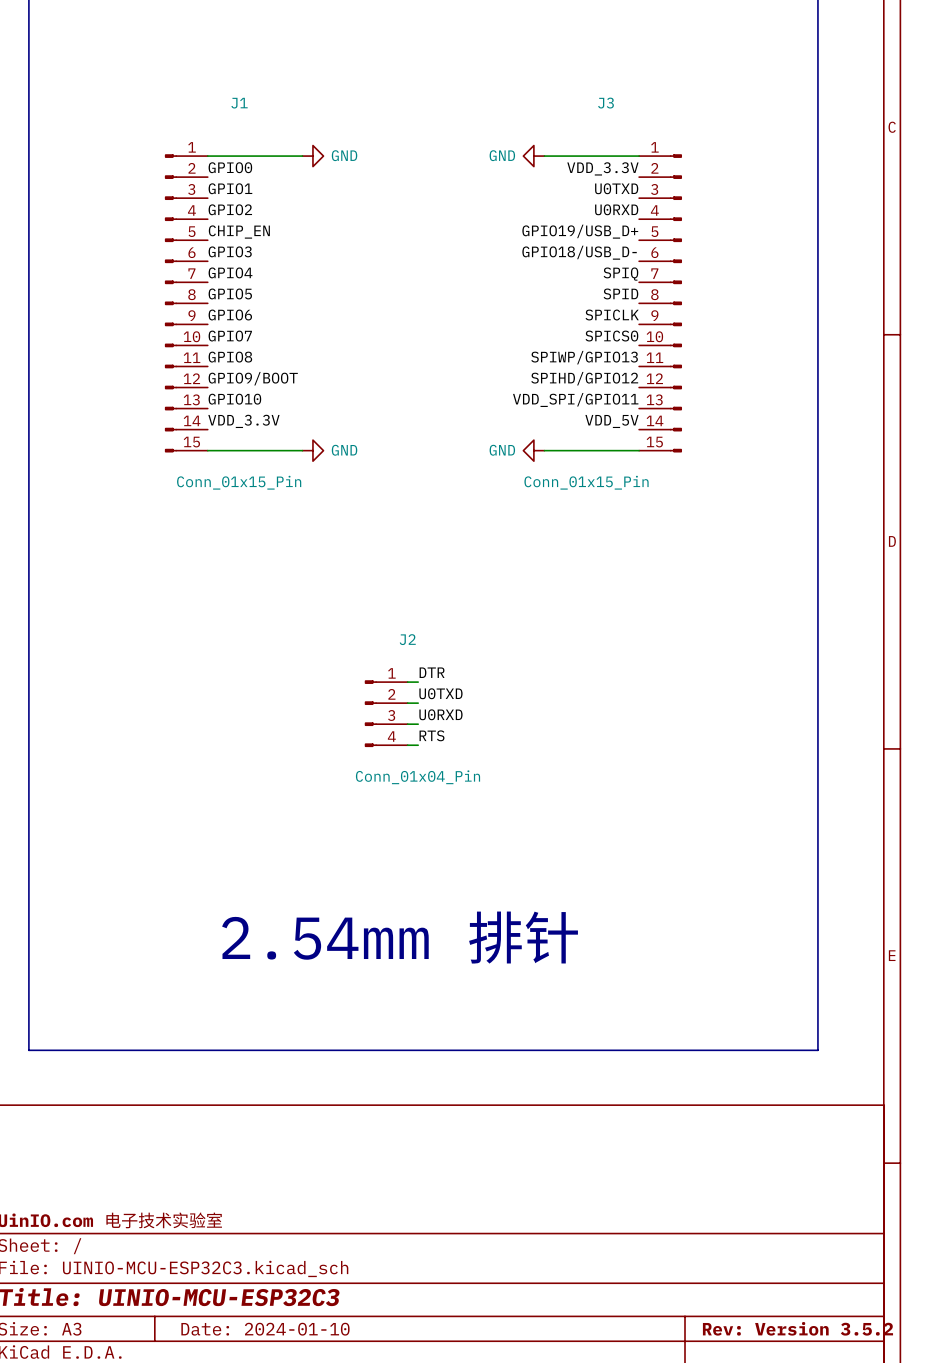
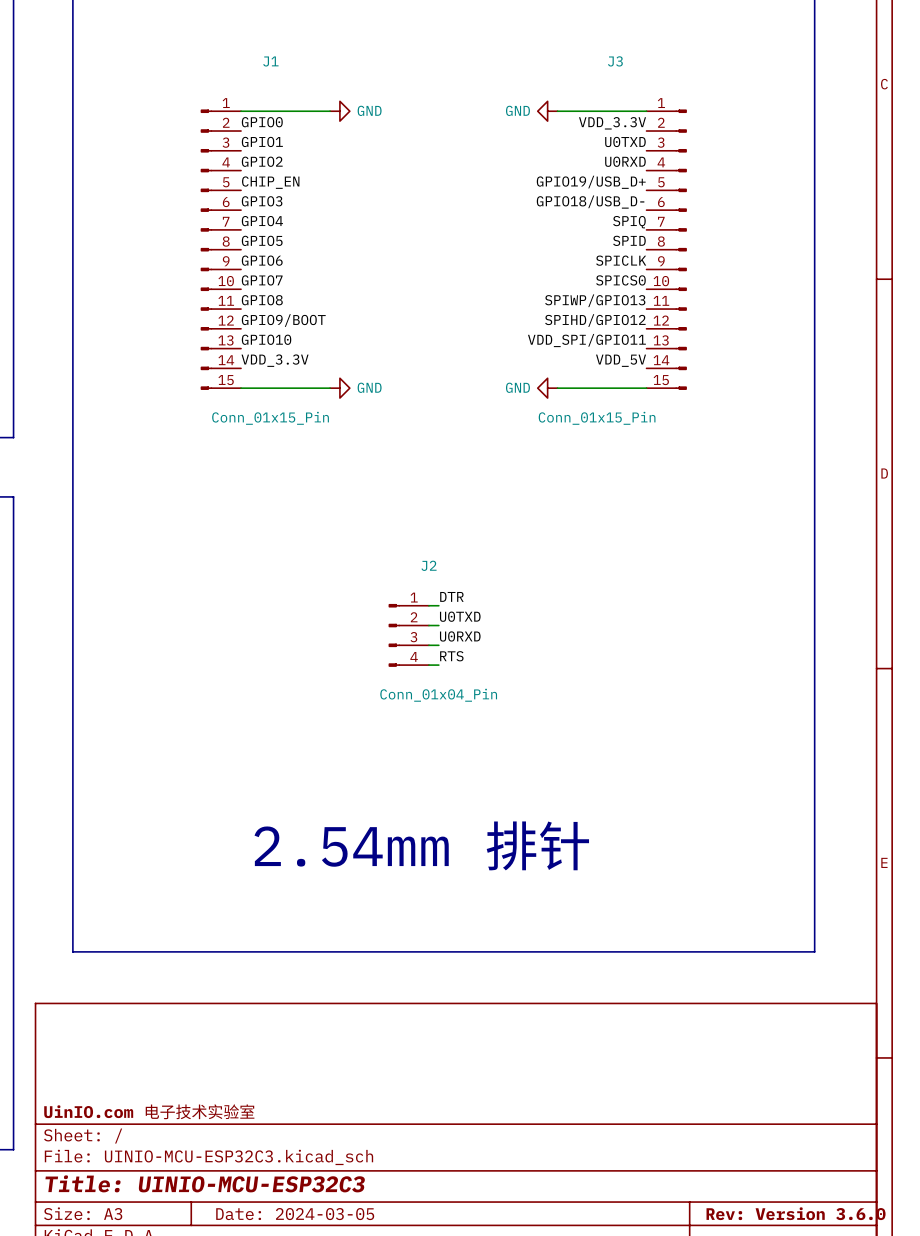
title block: Rev: Version 3.5.2 (797, 1328) -> Rev: Version 3.6.0 (796, 1213)
title block: Date: 2024-01-10 (265, 1329) -> Date: 2024-03-05 (295, 1214)

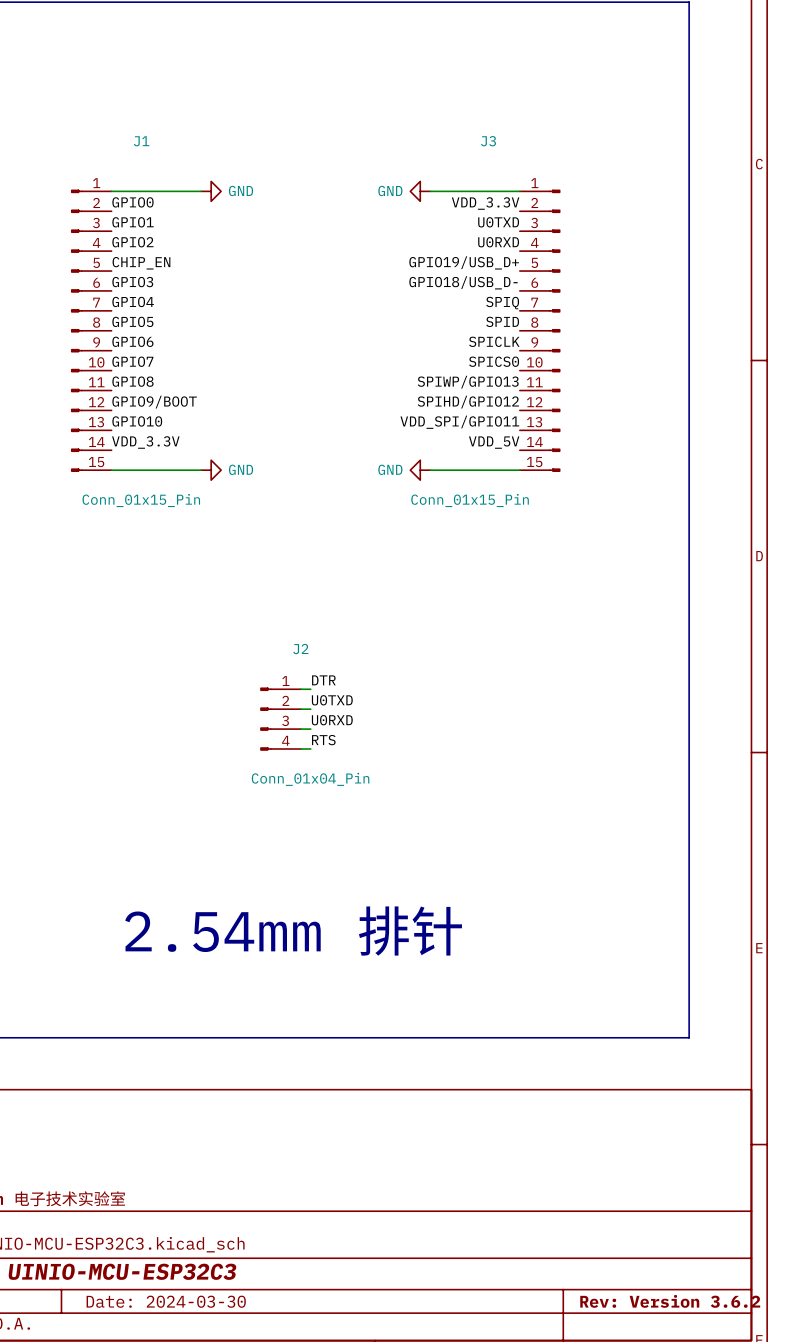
title block: Rev: Version 3.6.0 (796, 1213) -> Rev: Version 3.6.2 (670, 1301)
title block: Date: 2024-03-05 (295, 1214) -> Date: 2024-03-30 (166, 1301)

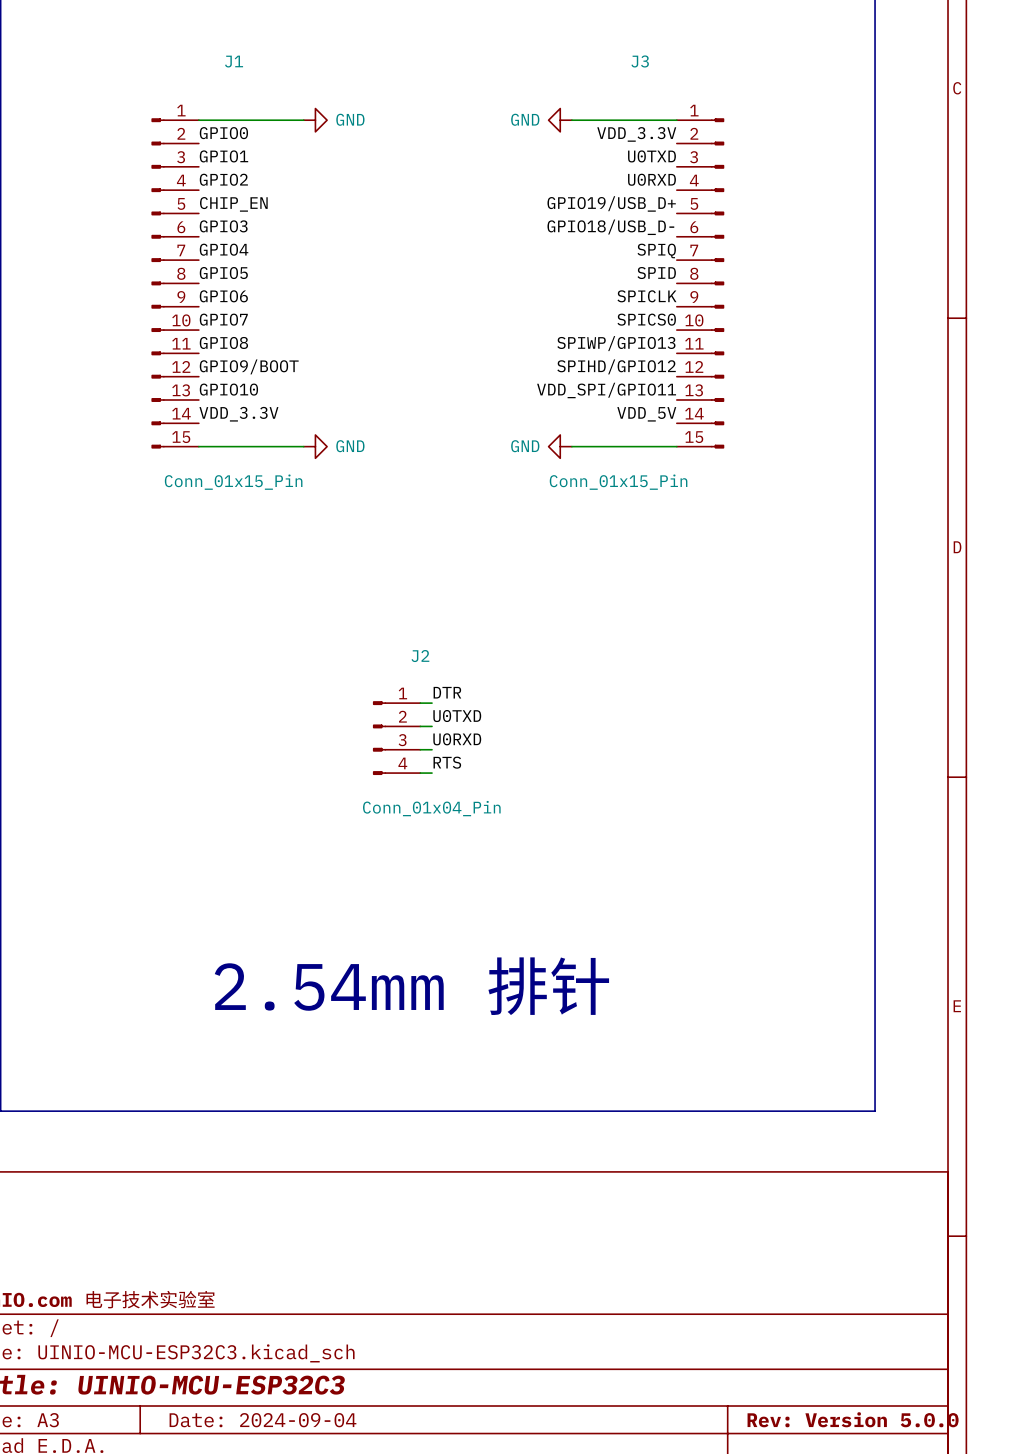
title block: Date: 2024-03-30 (166, 1301) -> Date: 2024-09-04 (262, 1420)
title block: Rev: Version 3.6.2 (670, 1301) -> Rev: Version 5.0.0 (853, 1419)

